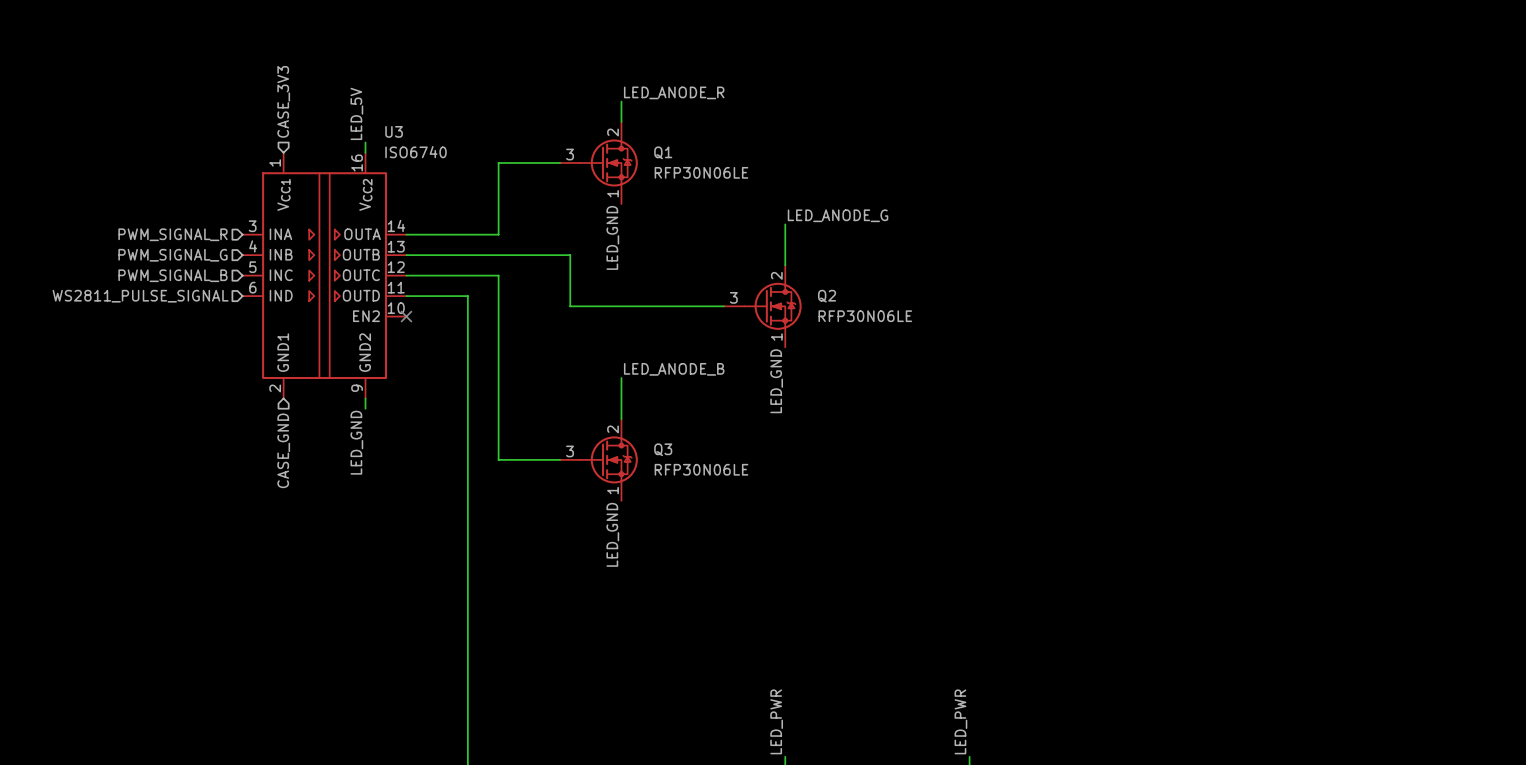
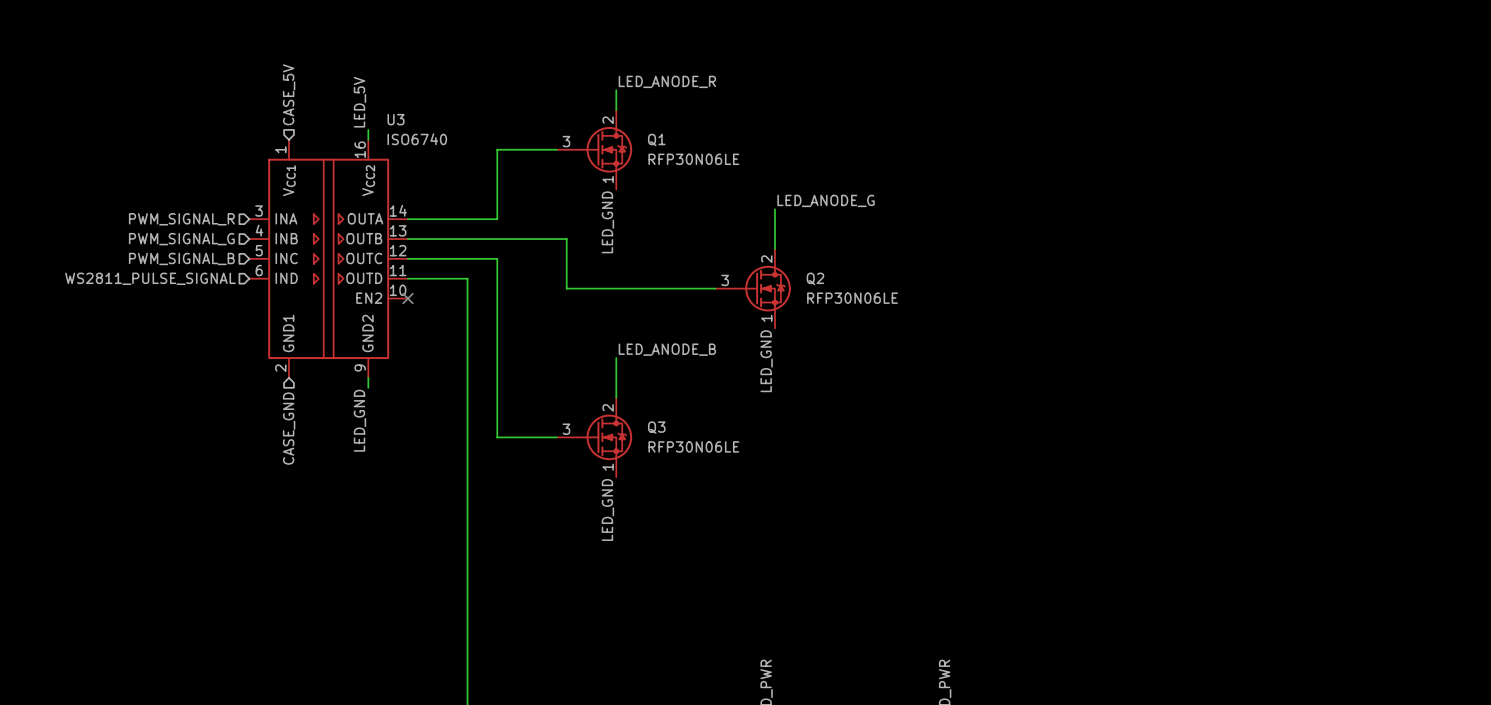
hierarchical label: CASE_3V3 (283, 101) -> CASE_5V (289, 94)

